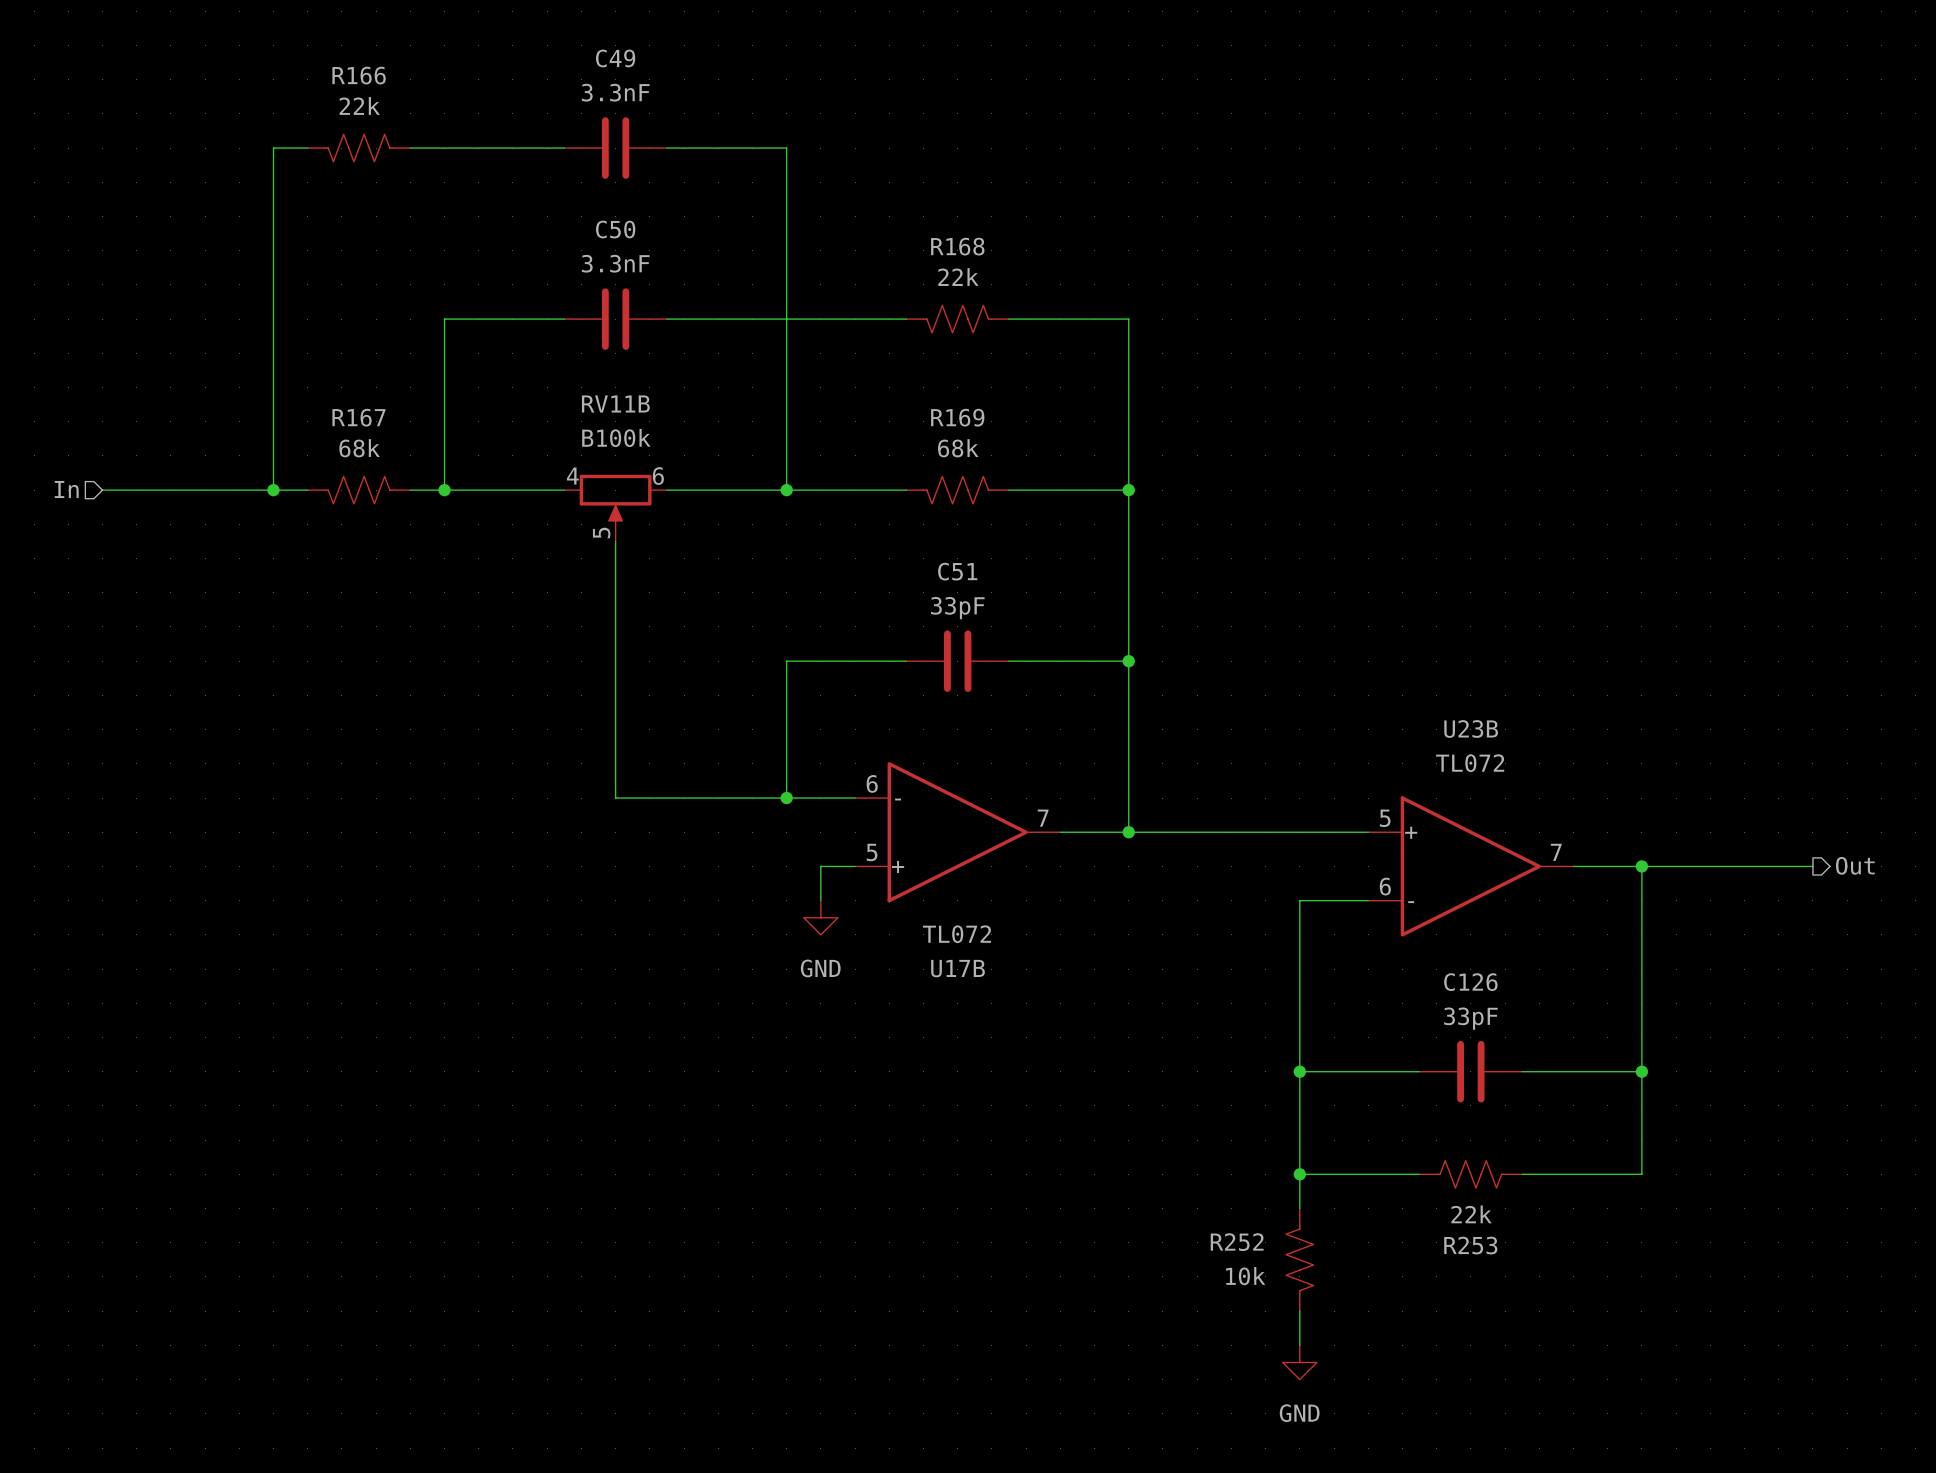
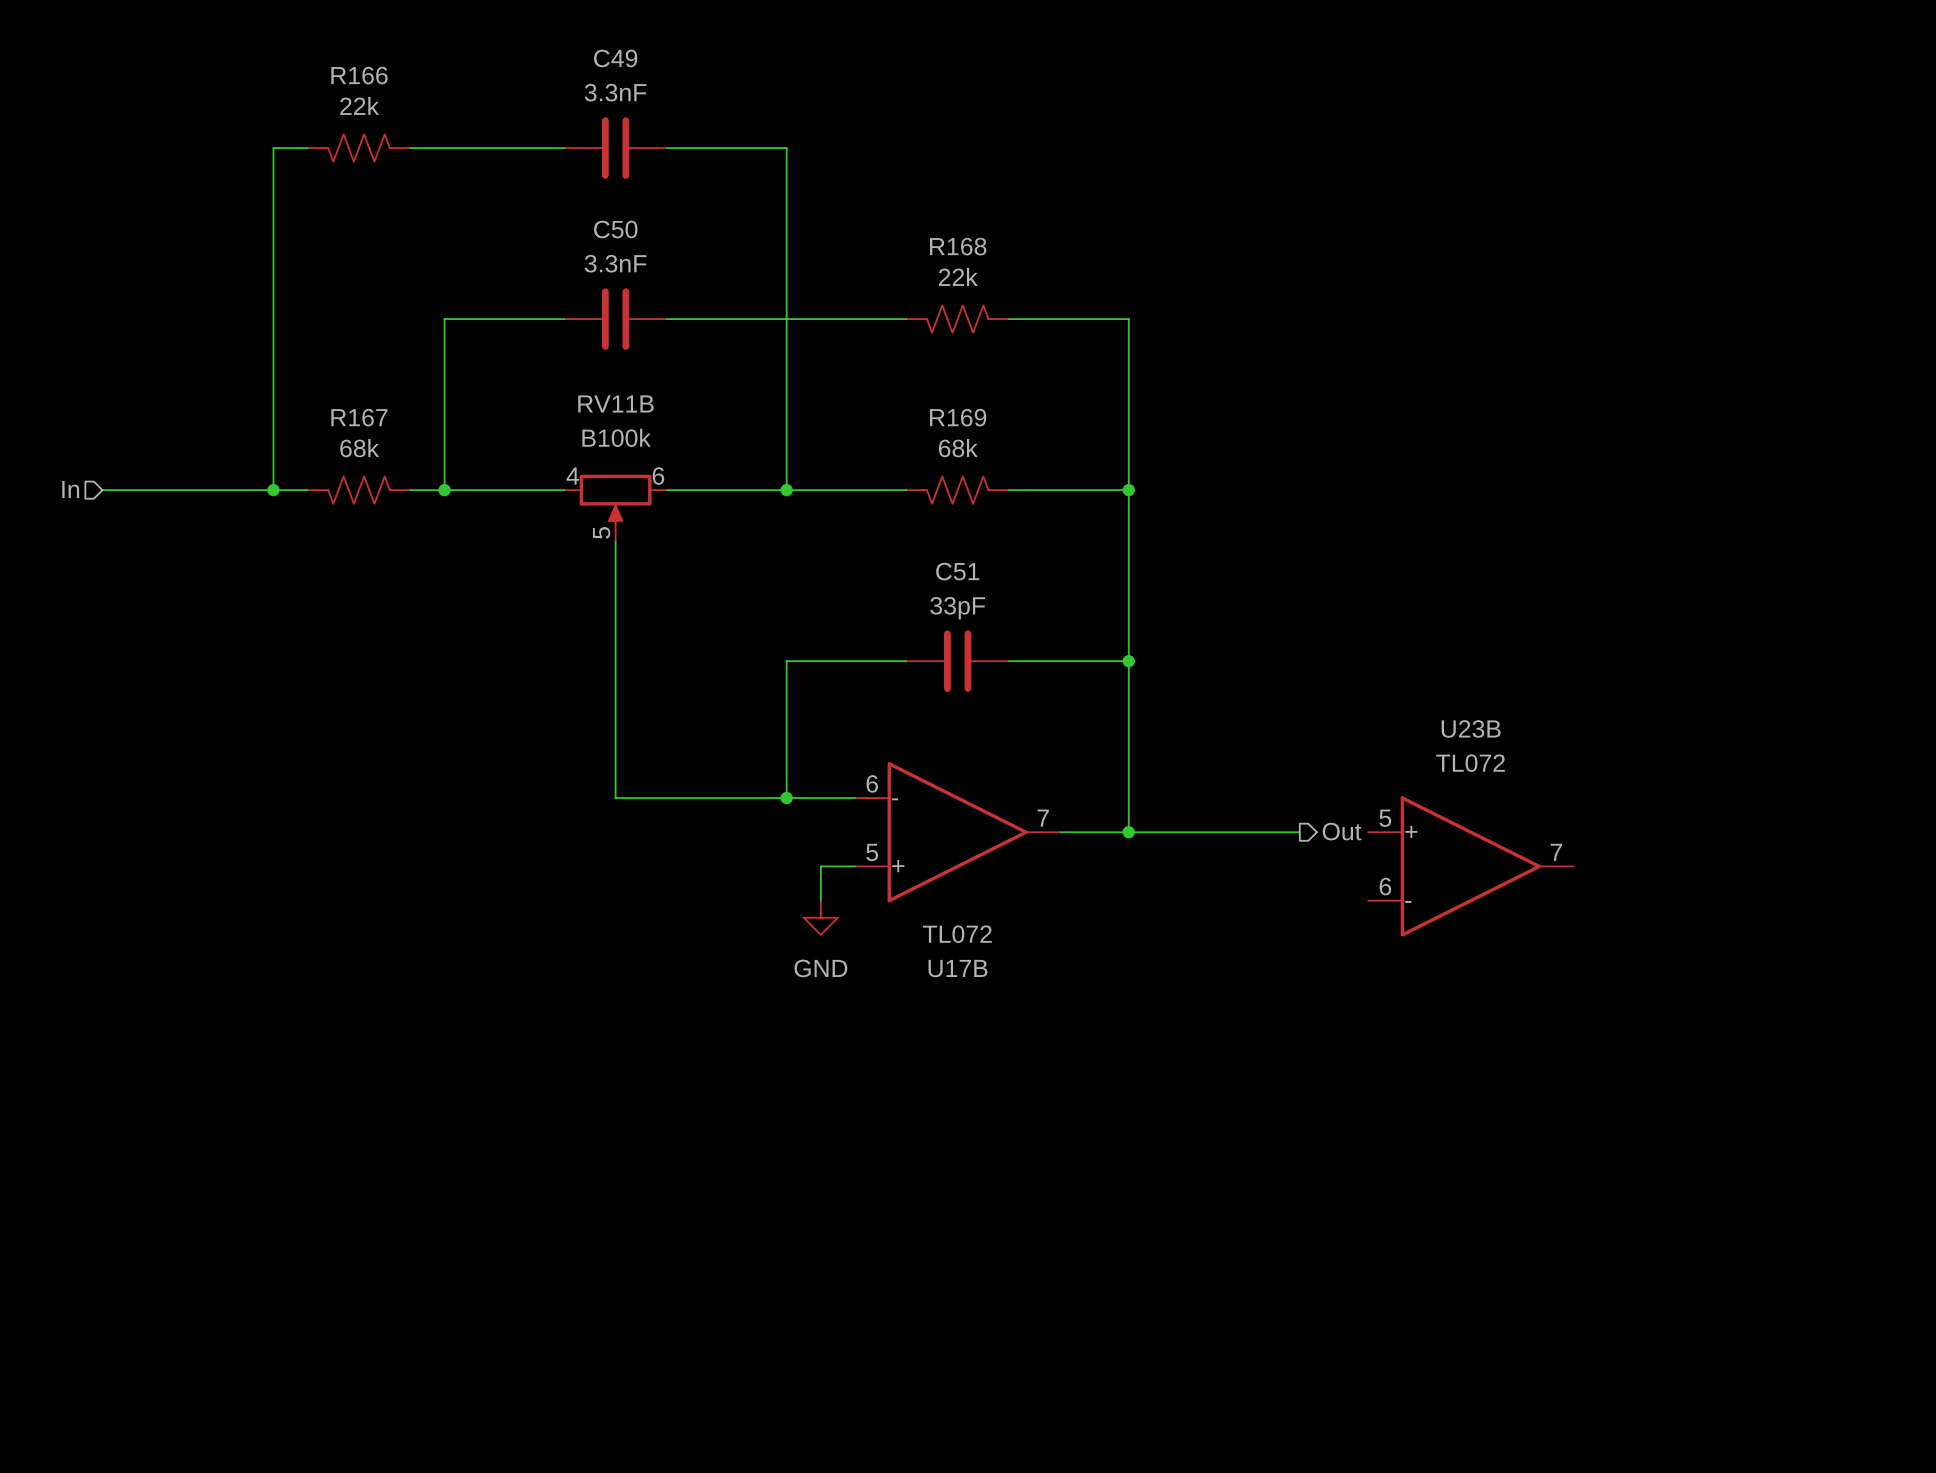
hierarchical label: none -> Out (1342, 831)
wire: (1299, 832) (1368, 832) -> none
hierarchical label: Out (1855, 865) -> none
wire: (1573, 866) (1812, 866) -> none
wire: (1641, 866) (1641, 1174) (1522, 1174) -> none
junction: (1641, 866) -> none
wire: (1368, 900) (1299, 900) (1299, 1208) -> none
wire: (1299, 1071) (1419, 1071) -> none
junction: (1299, 1071) -> none
C126: 33pF (1470, 1071) -> none
wire: (1522, 1071) (1641, 1071) -> none
junction: (1641, 1071) -> none
wire: (1299, 1174) (1419, 1174) -> none
junction: (1299, 1174) -> none
R253: 22k (1470, 1174) -> none
R252: 10k (1299, 1259) -> none
wire: (1299, 1311) (1299, 1345) -> none
power symbol: GND (1299, 1362) -> none

